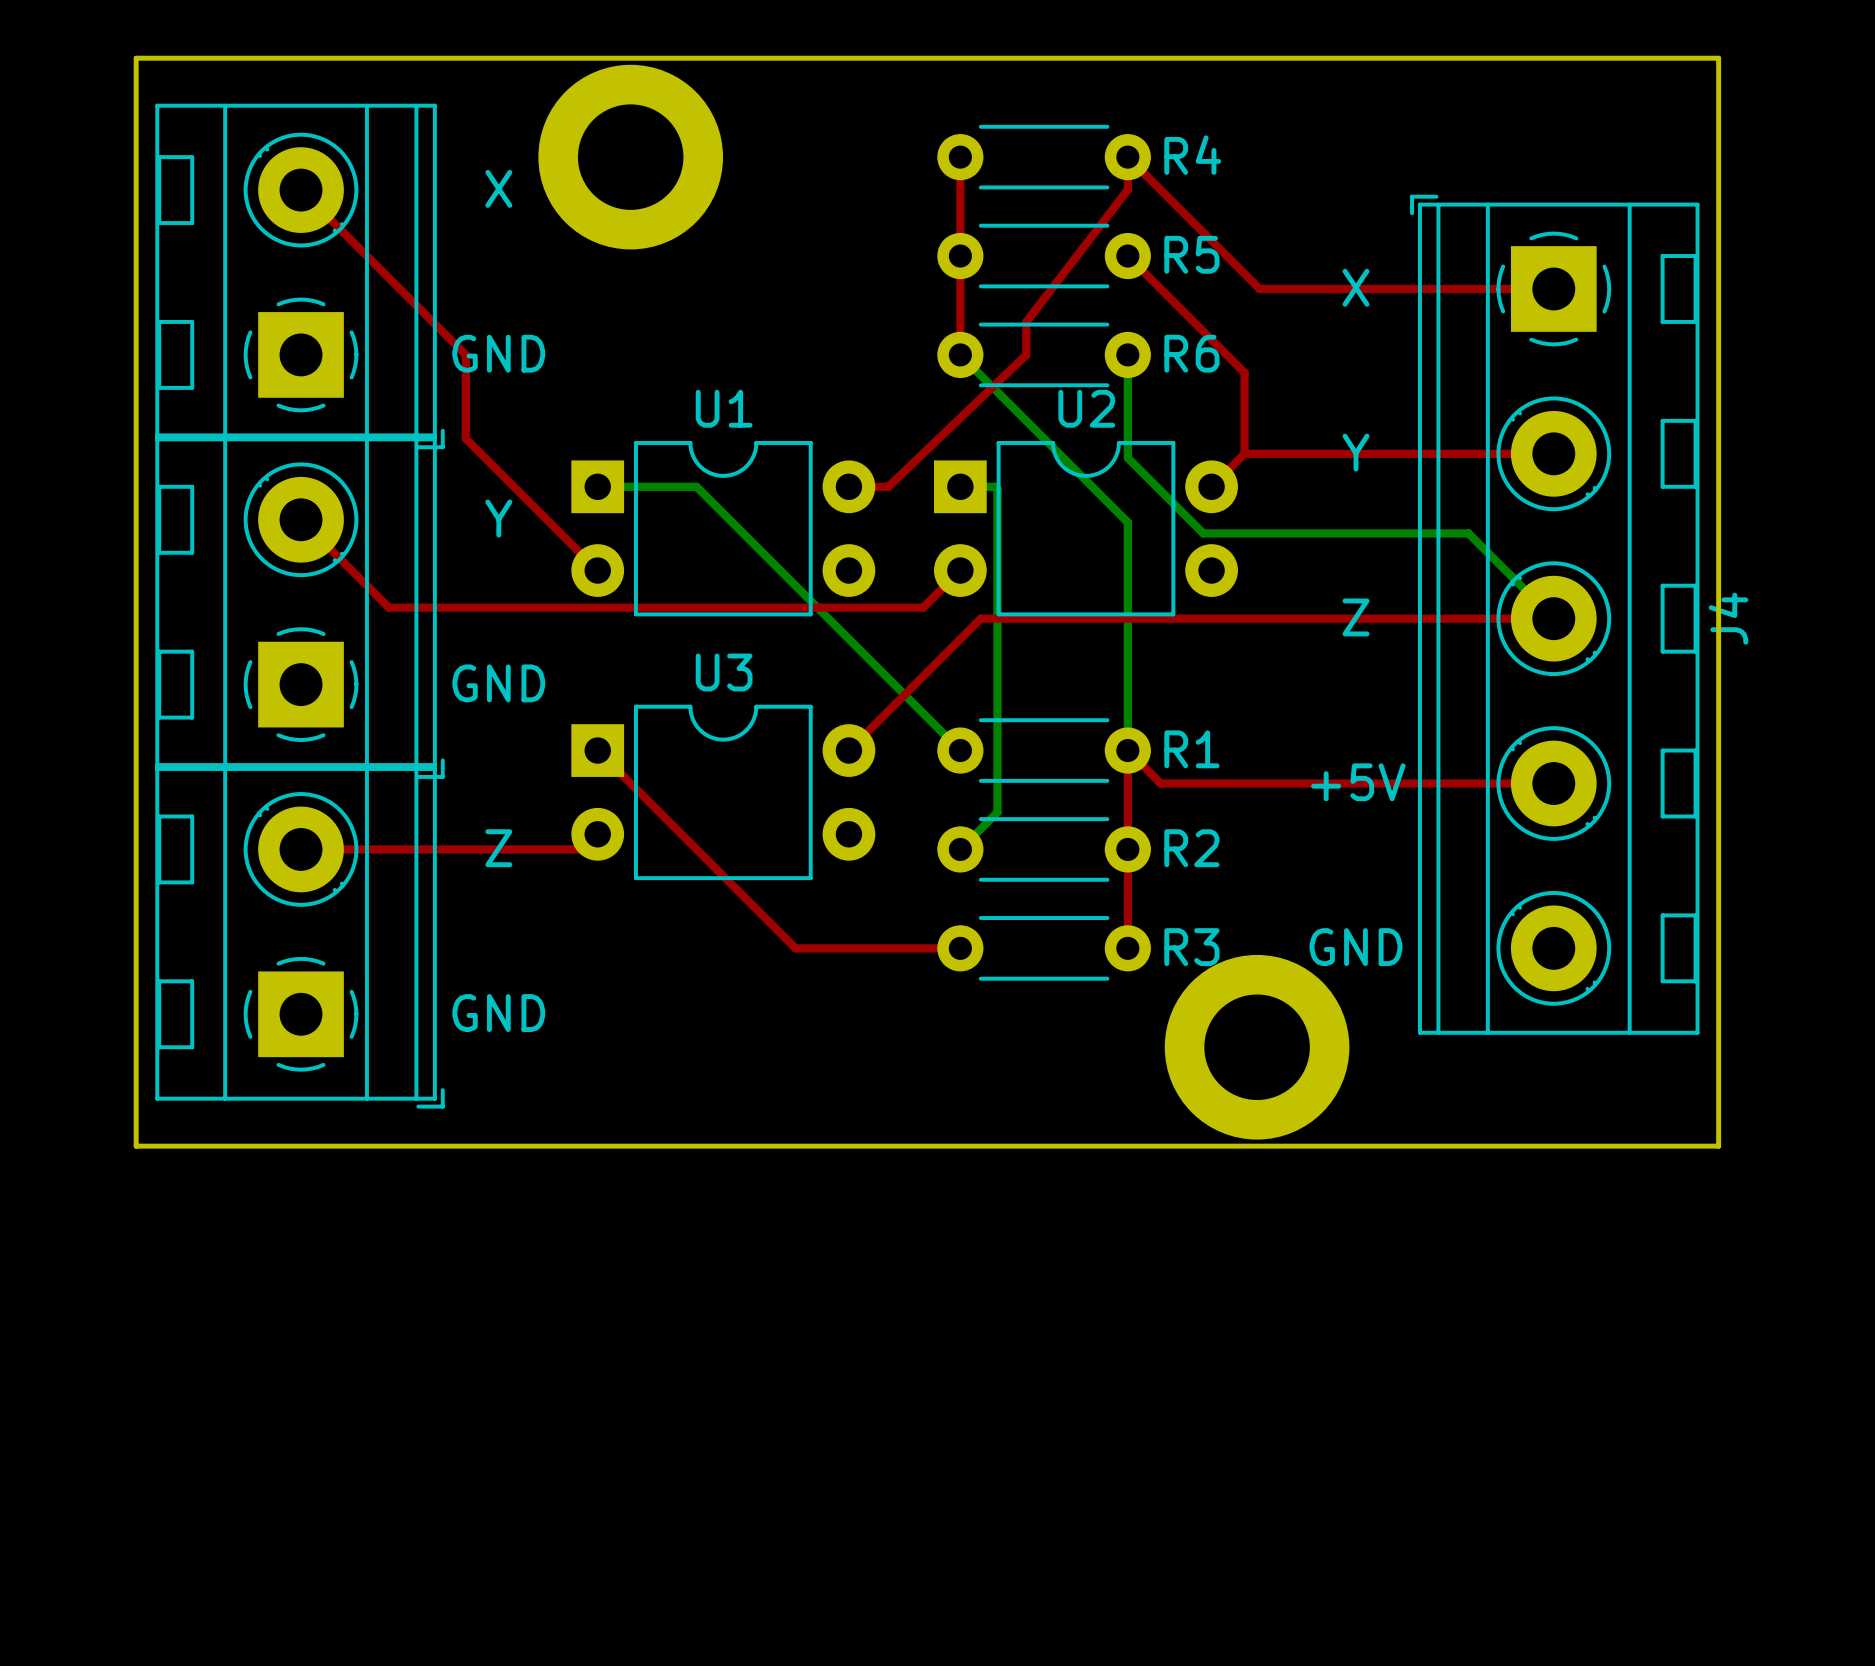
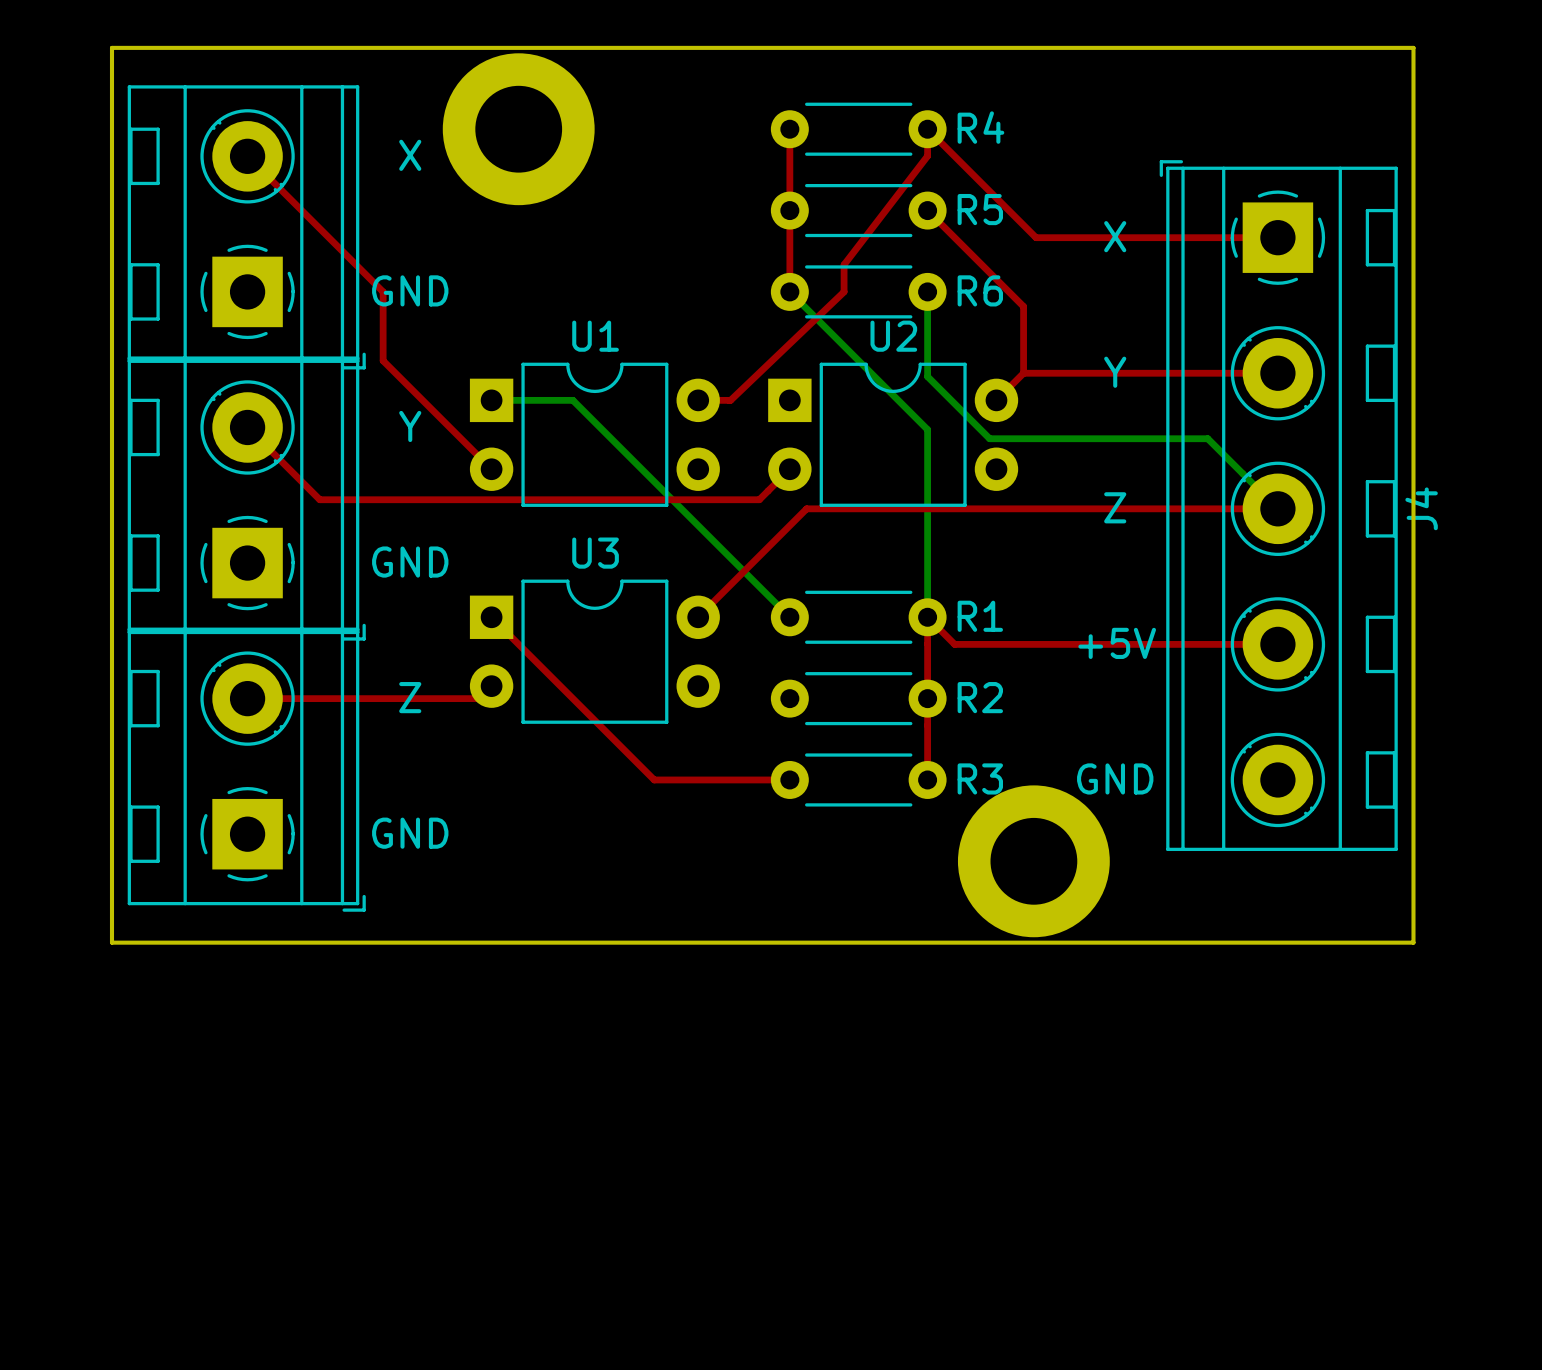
bottom track: (960, 486) (994, 486) (997, 489) (997, 812) (960, 849) -> none

